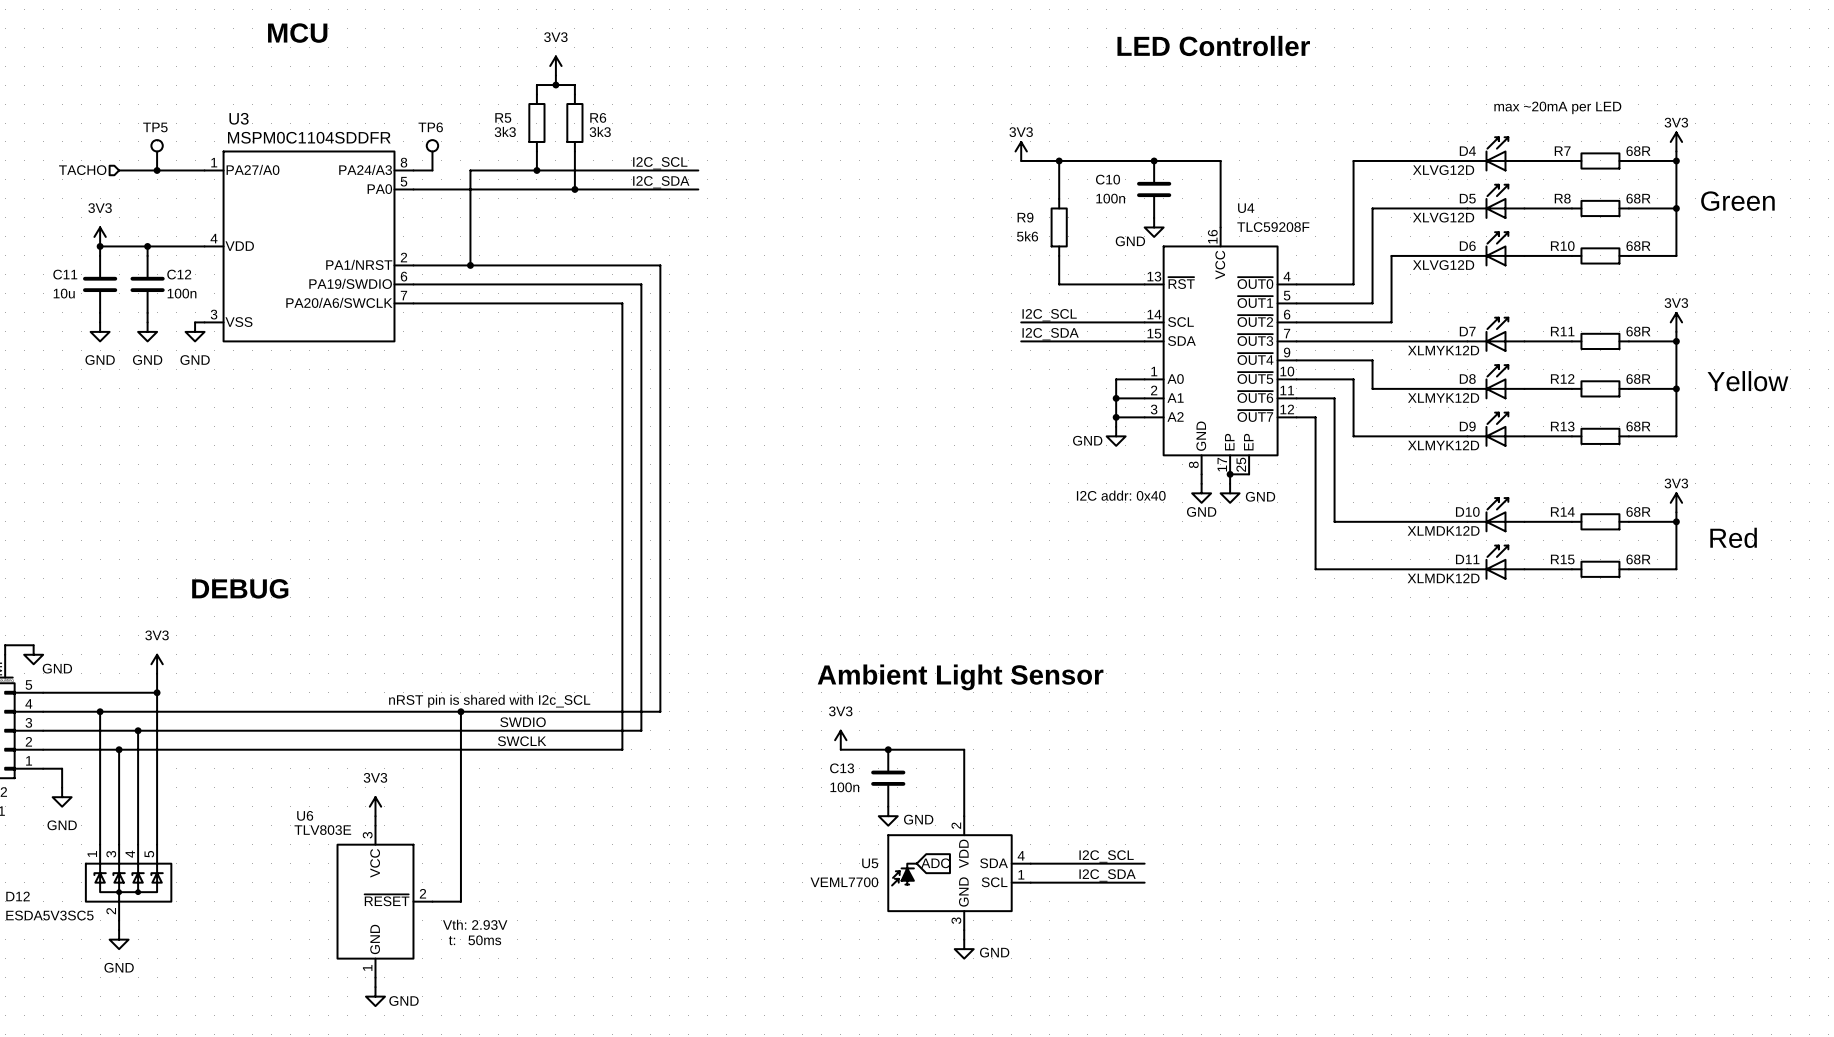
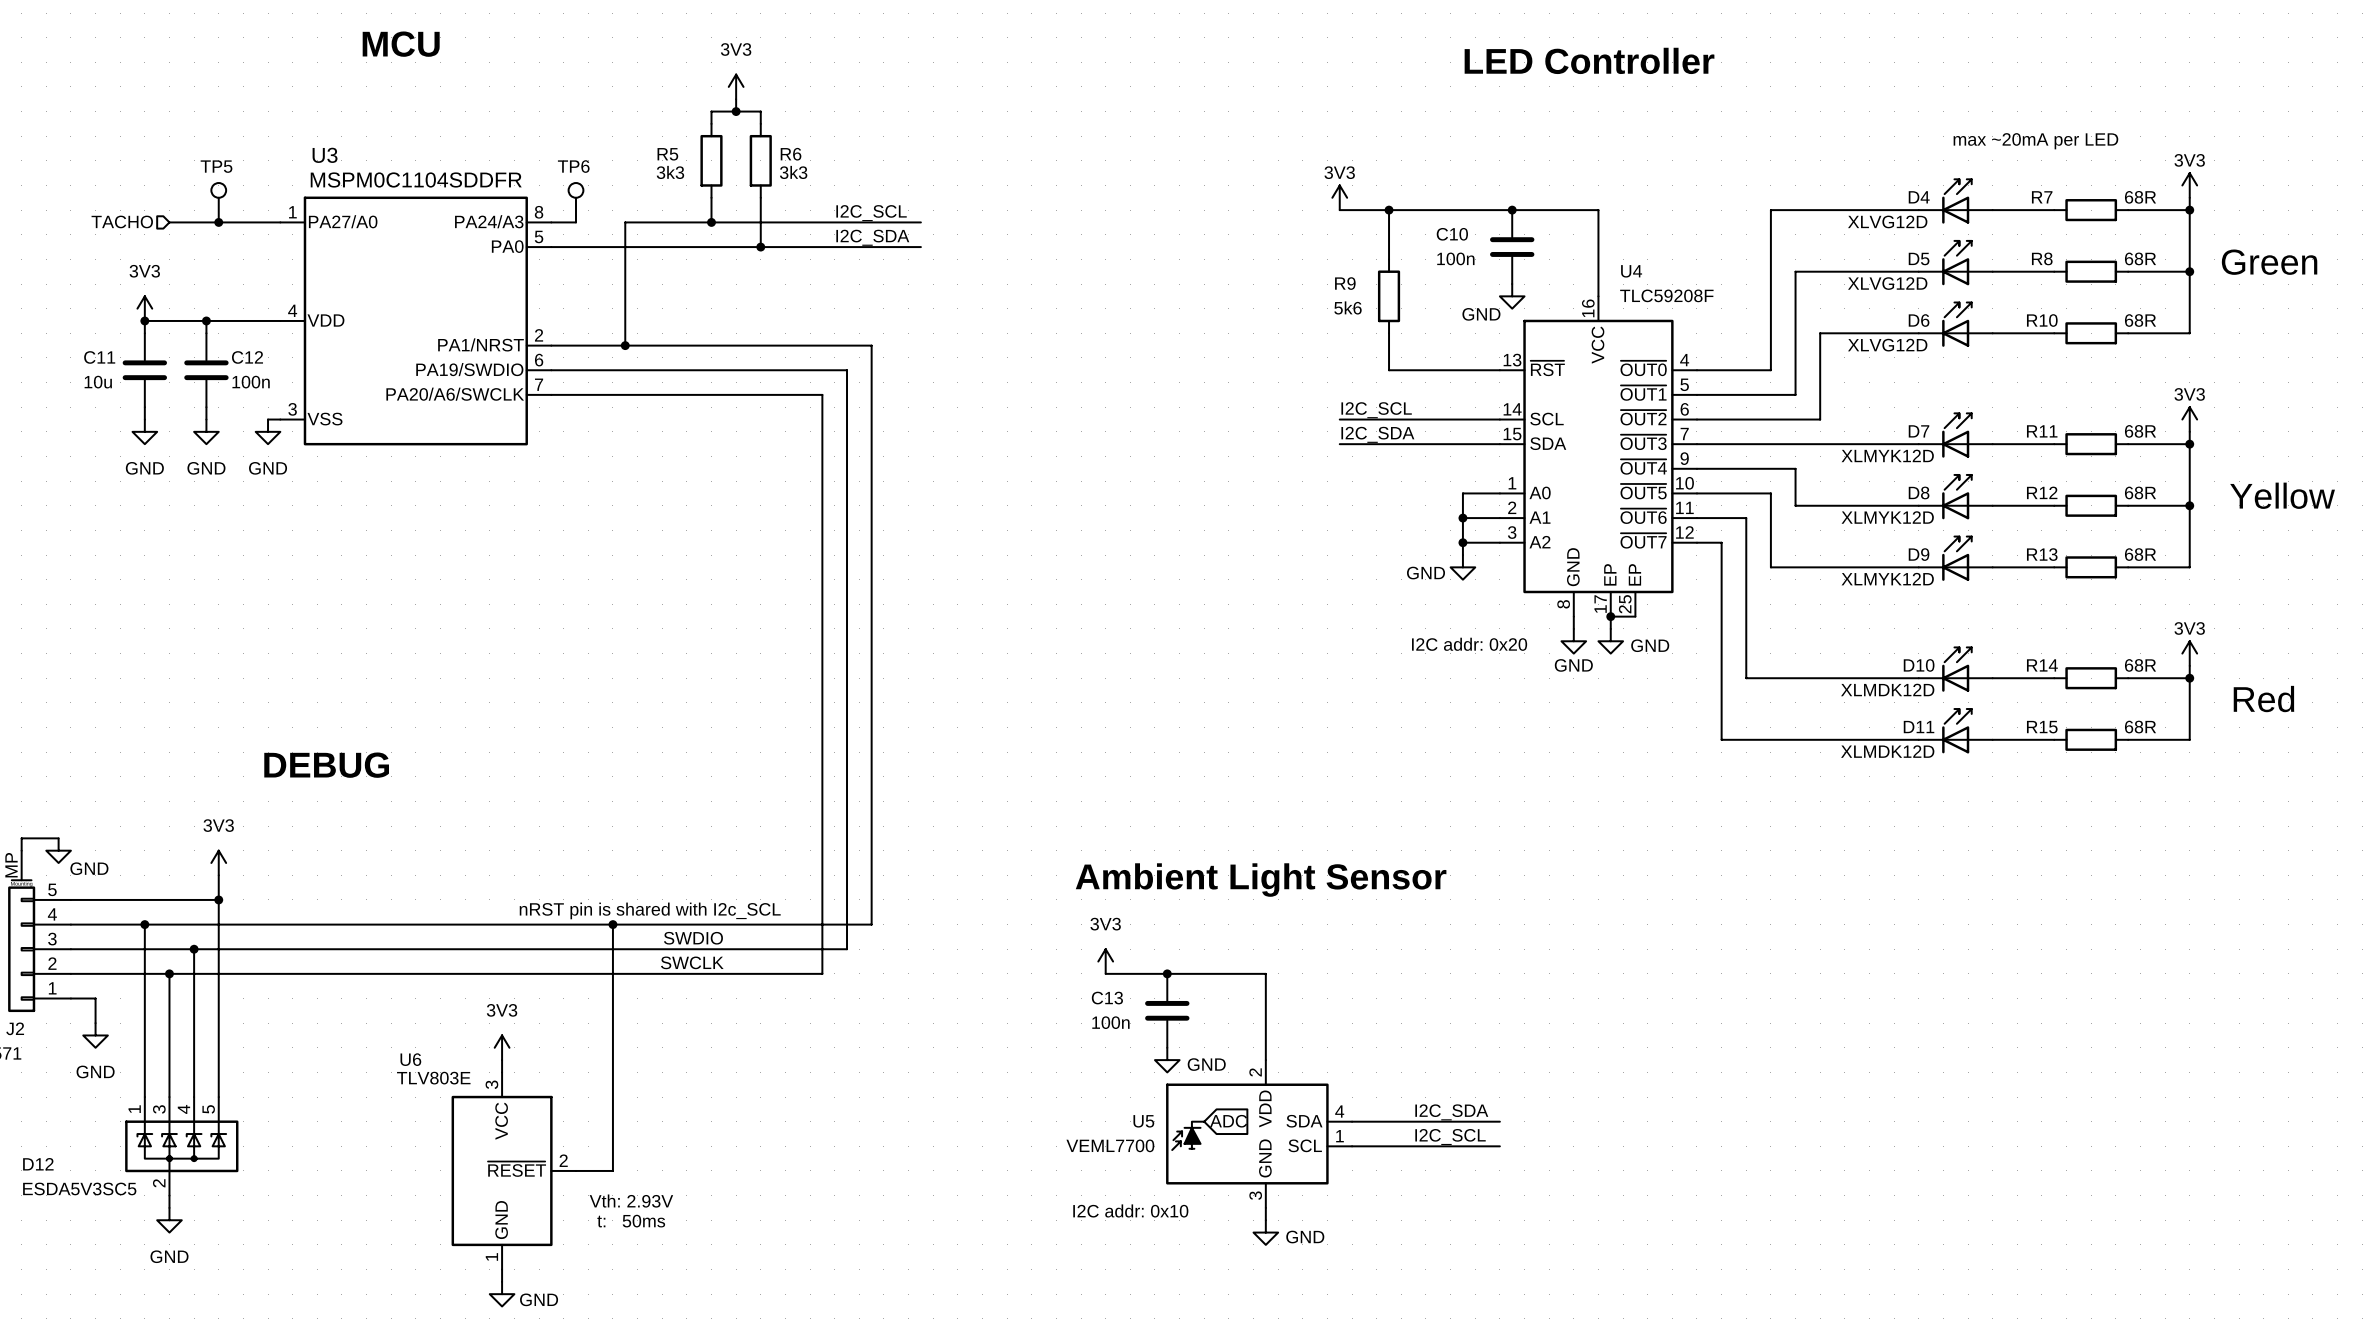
text: I2C addr: 0x40 (1121, 495) -> I2C addr: 0x20 (1469, 644)
label: I2C_SCL (1106, 856) -> I2C_SDA (1451, 1112)
label: I2C_SDA (1107, 875) -> I2C_SCL (1450, 1137)
text: none -> I2C addr: 0x10 (1130, 1210)

